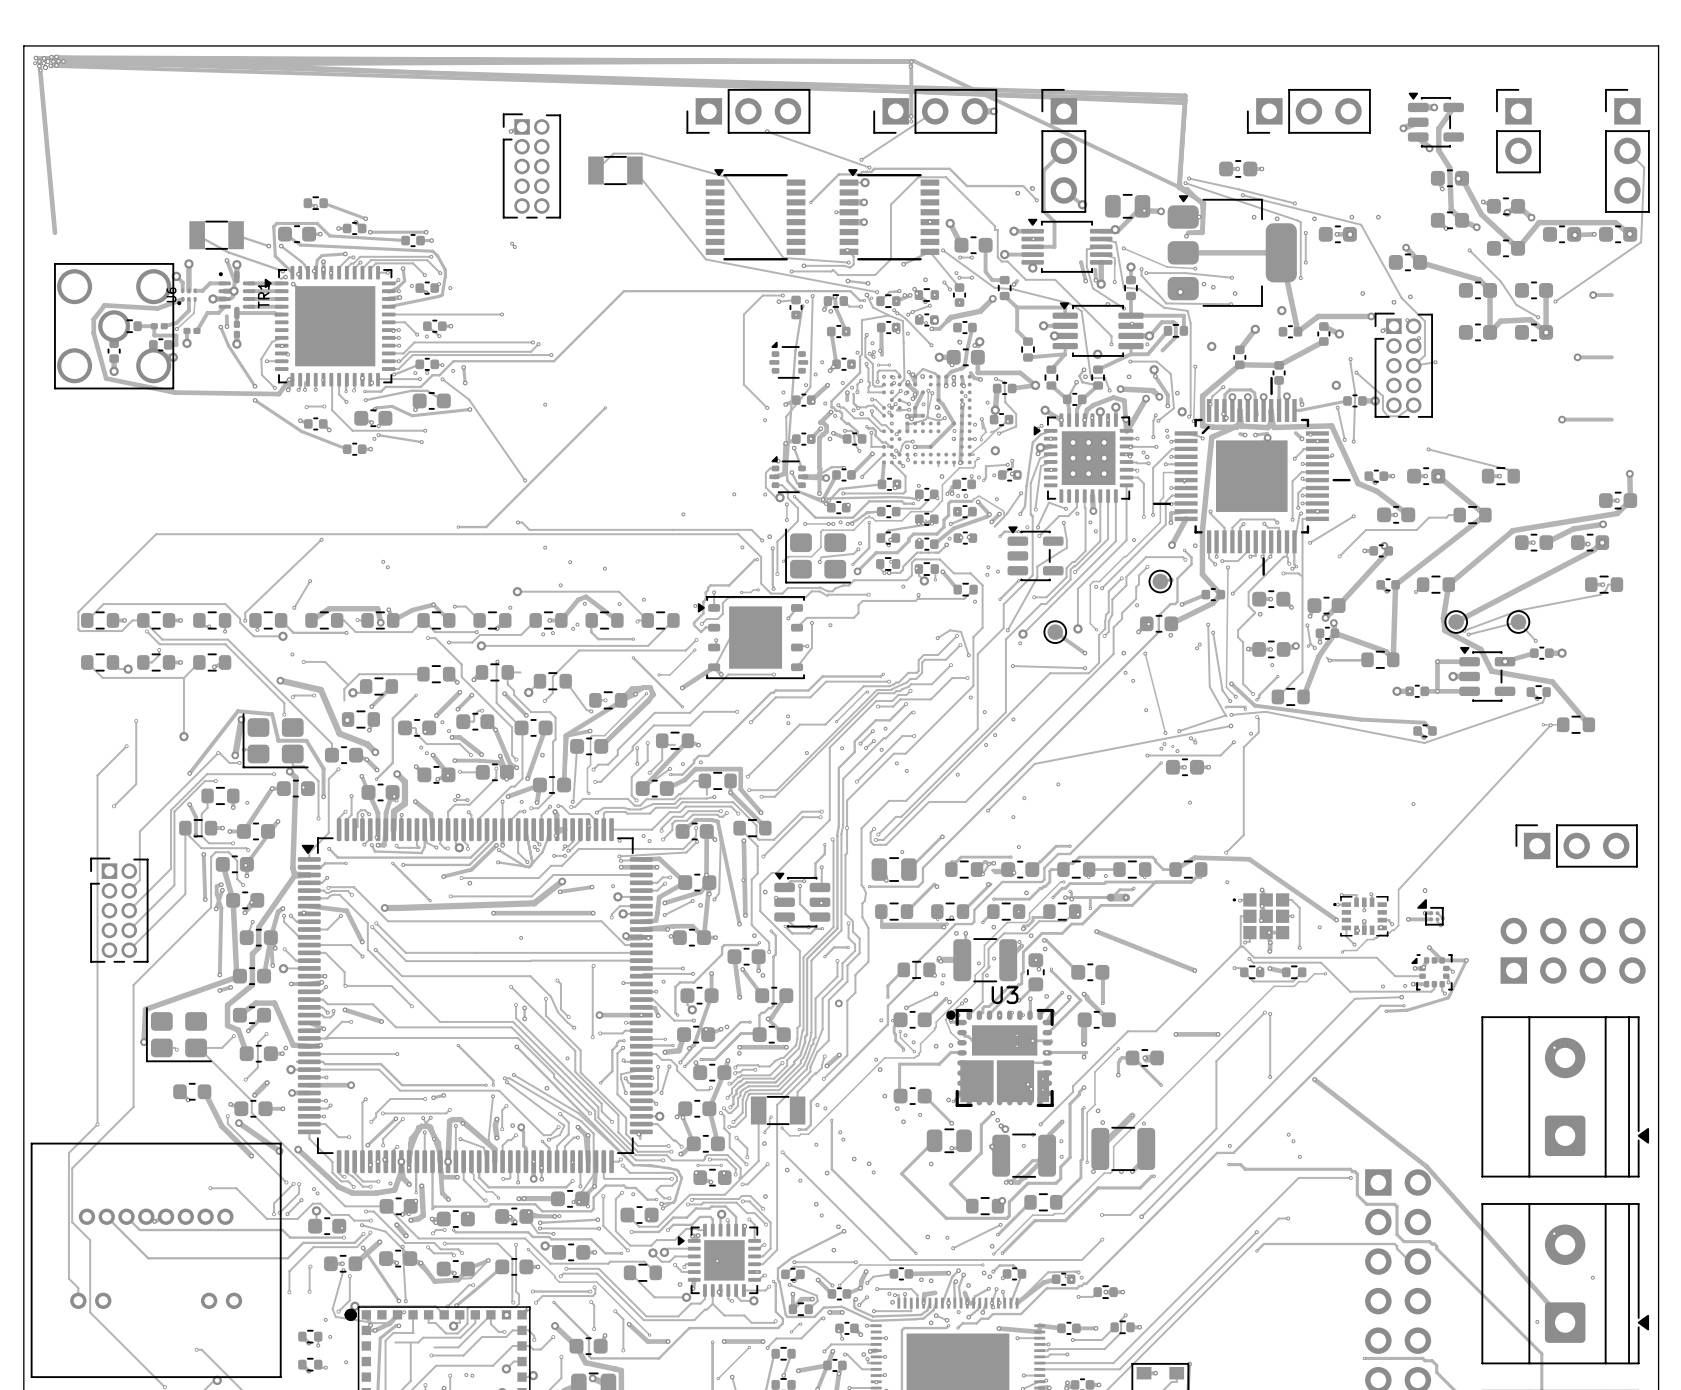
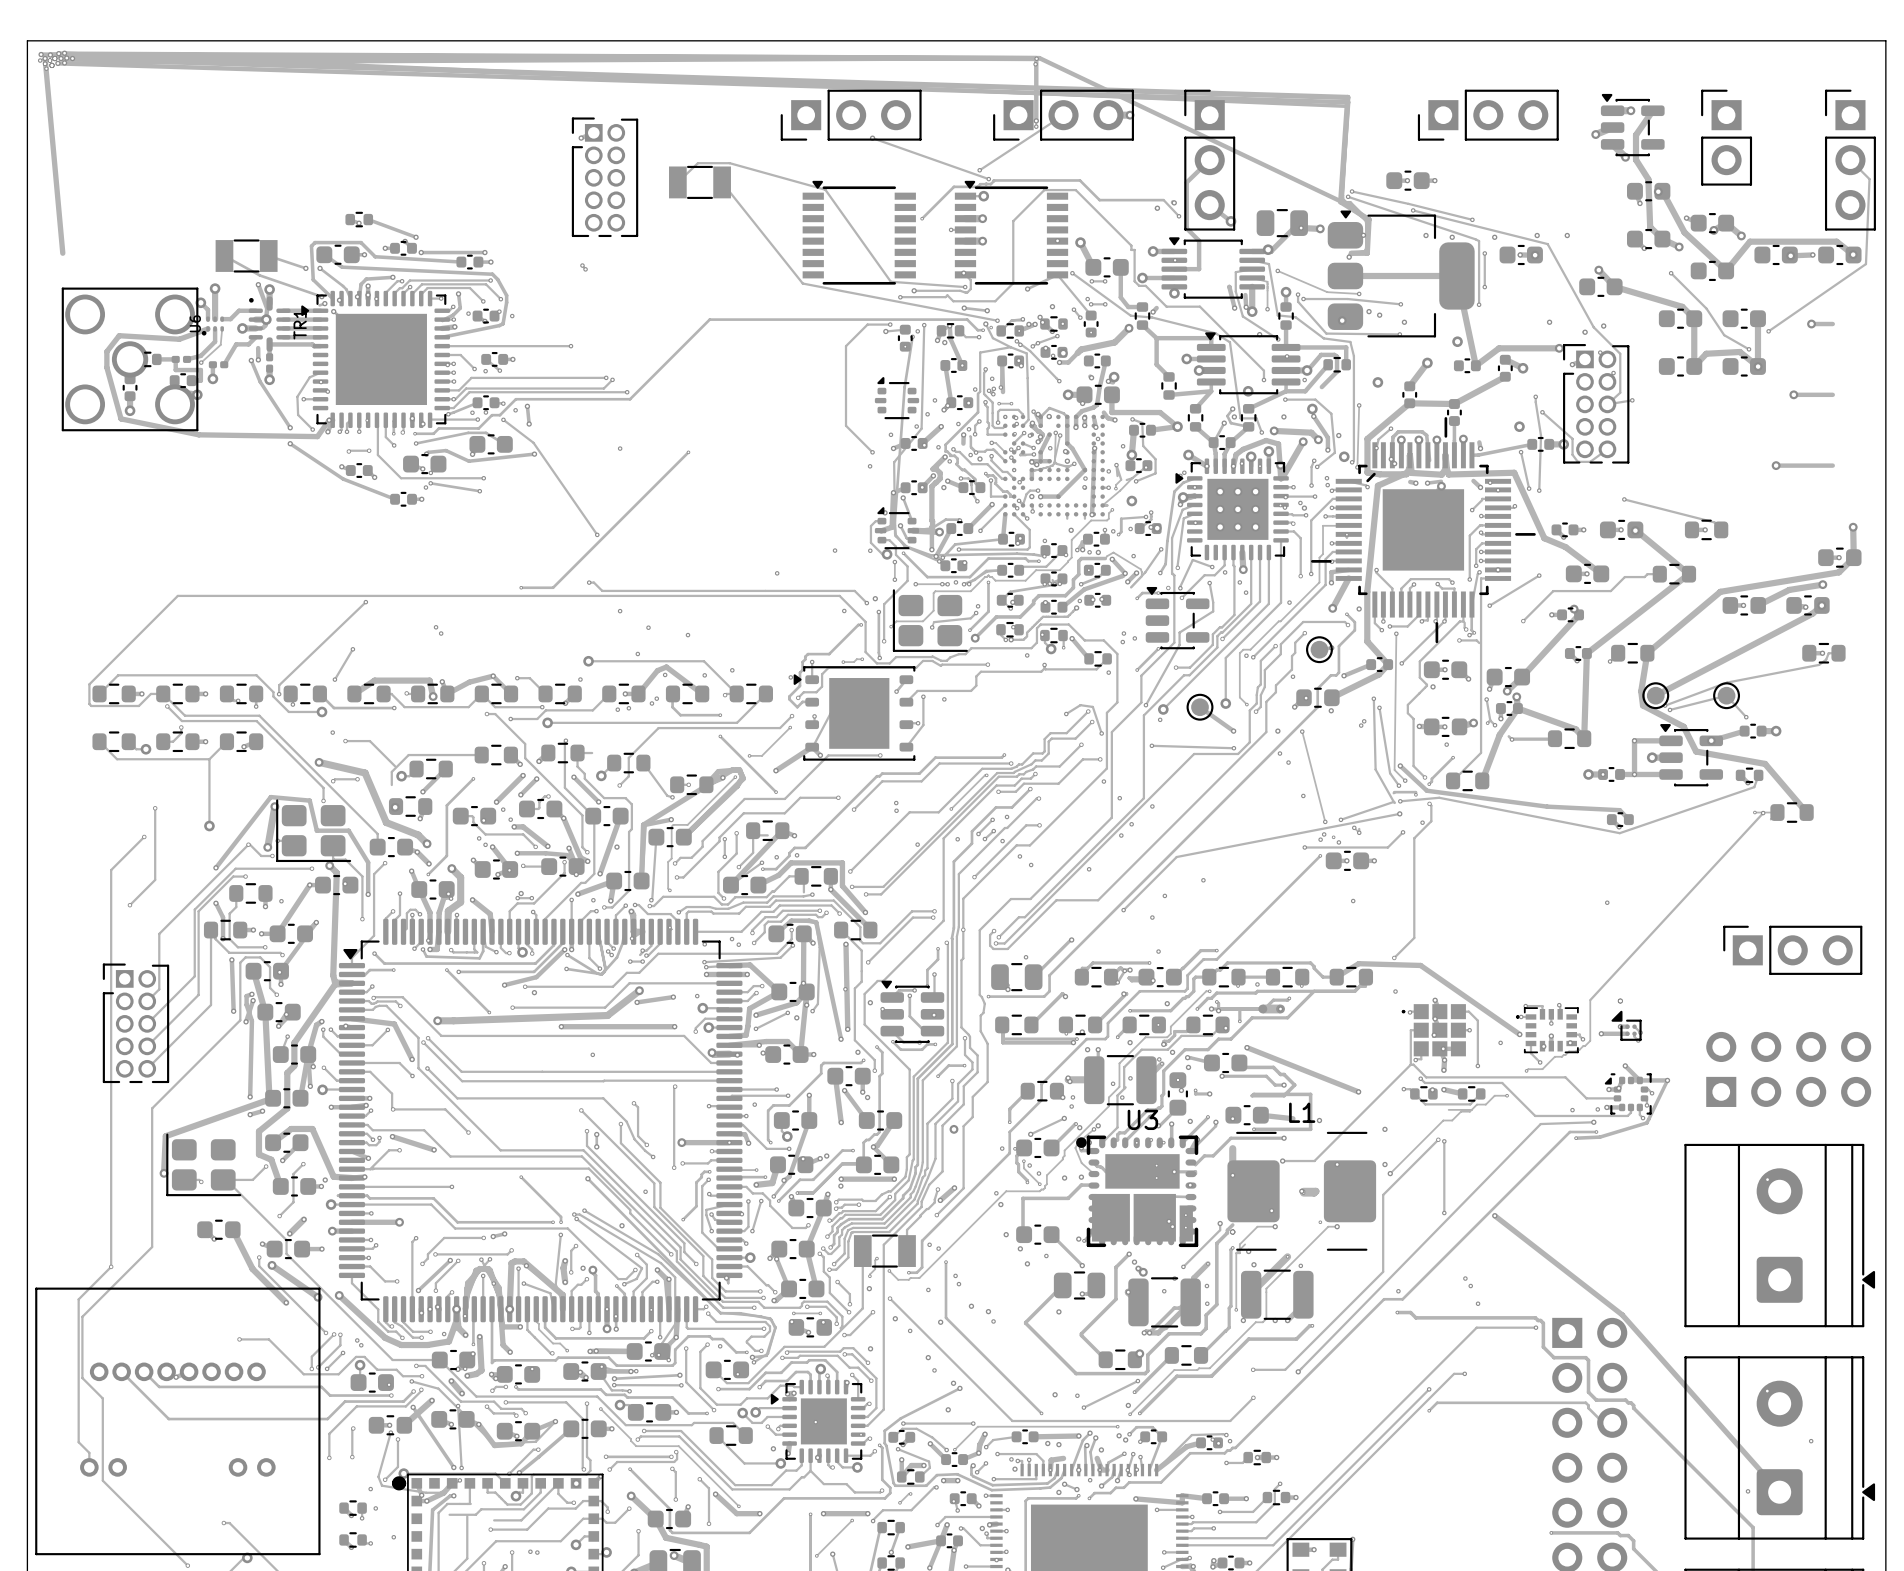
track: (1046, 940) (1078, 972) -> (1189, 1057) (1211, 1062)
part: none -> (1225, 1062)
track: none -> (1222, 1076) (1266, 1076) (1275, 1085) (1284, 1085)
via: none -> (1222, 1076)
via: none -> (1284, 1085)
track: (1051, 970) (1080, 1000) (1048, 1032) -> (1195, 1092) (1195, 1093) (1209, 1093)
via: none -> (1209, 1093)
part: (1090, 972) -> none
track: (1102, 972) (1102, 1003) -> (1239, 1062) (1241, 1067) (1273, 1067) (1294, 1085) (1284, 1095) (1252, 1095) (1253, 1094) (1310, 1094) (1310, 1129) (1253, 1129)
track: (1274, 986) (1113, 1146) -> (1337, 1226) (1328, 1226) (1266, 1288) (1266, 1292)
track: none -> (1471, 1109) (1461, 1111) (1452, 1120) (1443, 1120) (1390, 1173)
part: none -> (1247, 1115)
track: none -> (1260, 1115) (1292, 1118)
track: (1084, 994) (1108, 1019) -> none
via: none -> (1319, 1120)
via: none -> (1384, 1129)
track: none -> (1284, 1138) (1230, 1138) (1213, 1155) (1204, 1155) (1195, 1164) (1192, 1162)
via: none -> (1284, 1138)
part: (1096, 1019) -> none
track: (1127, 1031) (1073, 1086) -> none
via: none -> (1282, 1161)
track: (1175, 1034) (1218, 1034) -> none
via: none -> (1390, 1173)
track: (1118, 1048) (1094, 1071) (1094, 1104) -> none
via: (1118, 1048) -> none
track: (1047, 1052) (1086, 1052) (1084, 1057) -> none
via: (1084, 1057) -> none
part: (1144, 1057) -> none
L1: none -> (1301, 1191)
track: (1118, 1075) (1119, 1059) (1133, 1057) (1161, 1085) -> none
via: none -> (1220, 1223)
via: (1084, 1087) -> none
track: none -> (1275, 1226) (1257, 1226) (1239, 1244) (1239, 1253) (1236, 1253)
via: none -> (1275, 1226)
via: none -> (1337, 1226)
via: none -> (1232, 1232)

